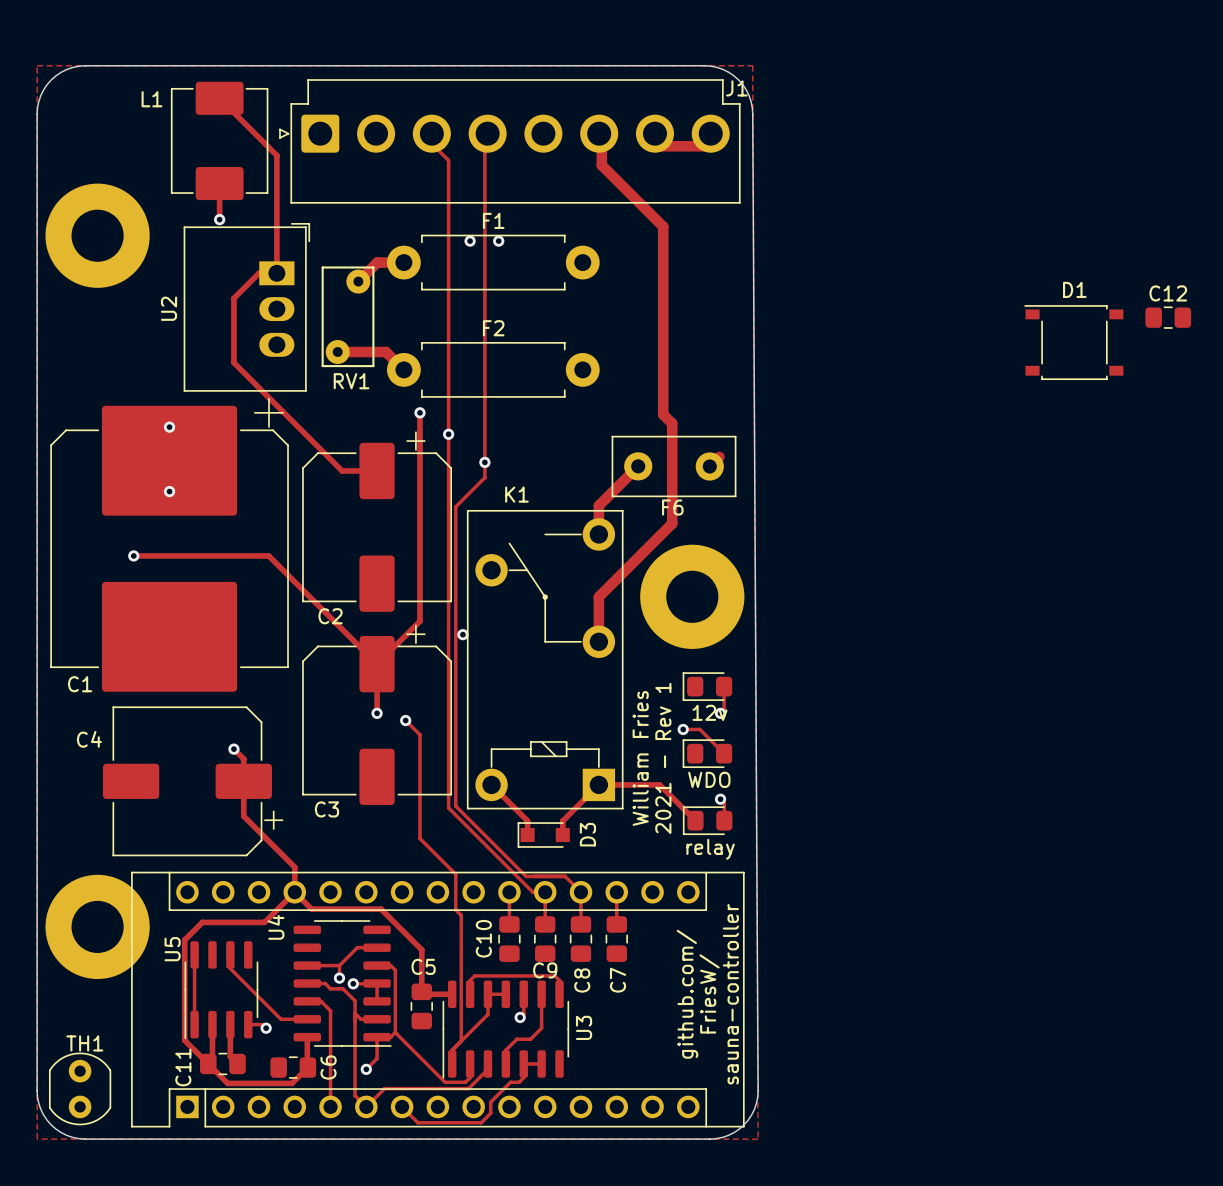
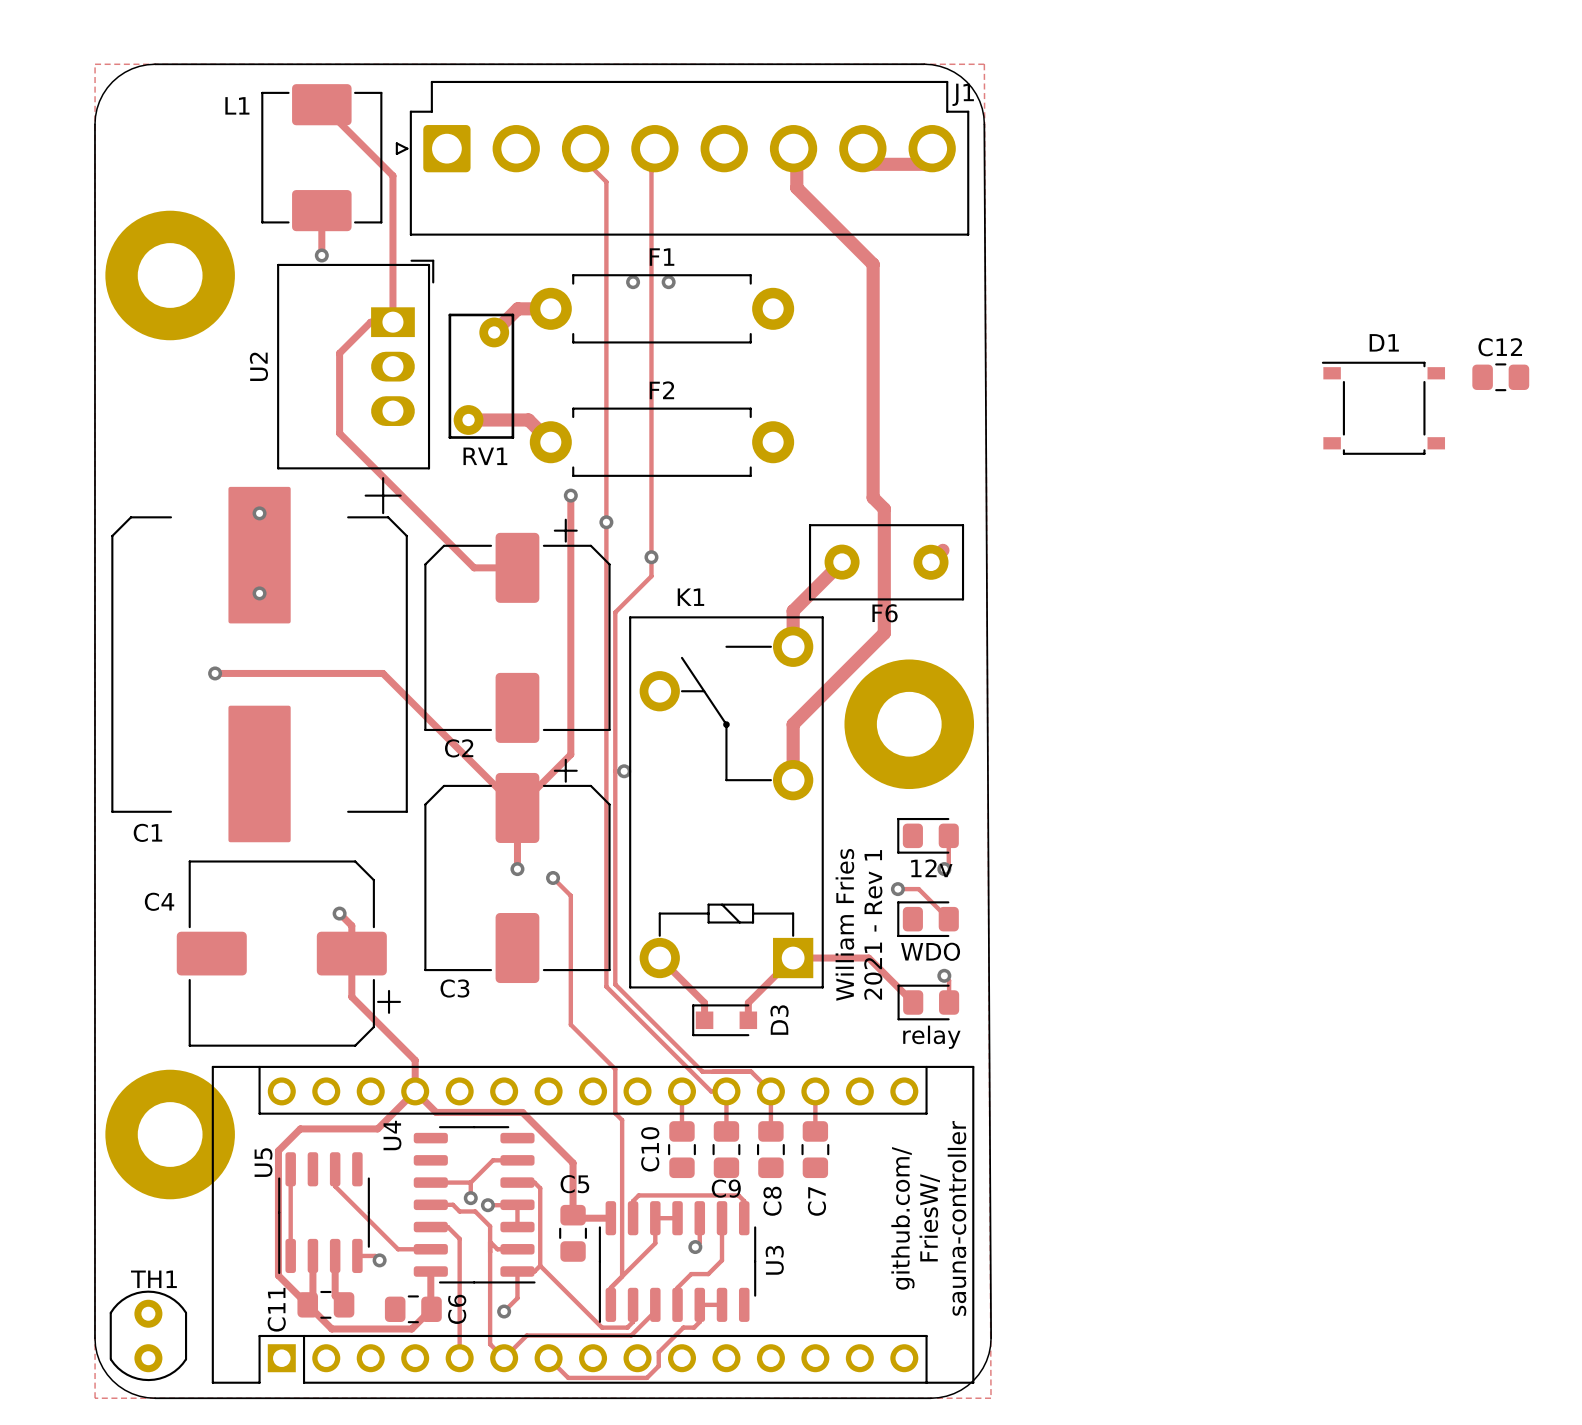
C1 footprint: [50, 397, 289, 692] -> [111, 477, 408, 843]

